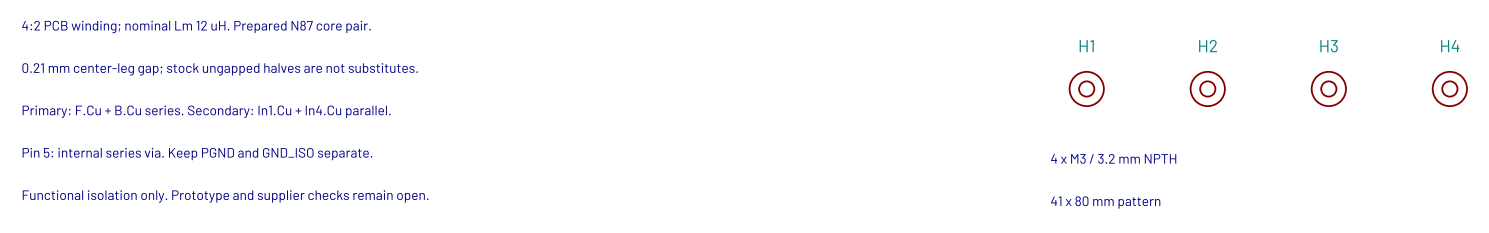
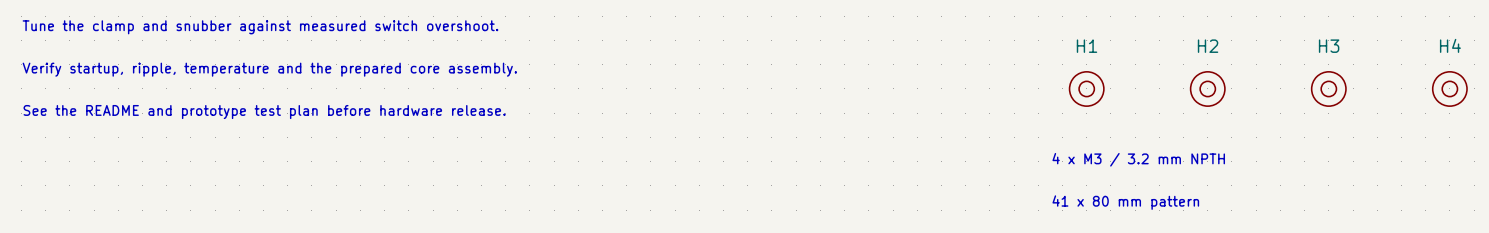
text: 4:2 PCB winding; nominal Lm 12 uH. Prepared N87 core pair. (196, 27) -> Tune the clamp and snubber against measured switch overshoot. (260, 27)
text: 0.21 mm center-leg gap; stock ungapped halves are not substitutes. (220, 69) -> Verify startup, ripple, temperature and the prepared core assembly. (269, 69)
text: Primary: F.Cu + B.Cu series. Secondary: In1.Cu + In4.Cu parallel. (206, 111) -> See the README and prototype test plan before hardware release. (264, 112)
text: Pin 5: internal series via. Keep PGND and GND_ISO separate. (197, 154) -> none
text: Functional isolation only. Prototype and supplier checks remain open. (225, 196) -> none

